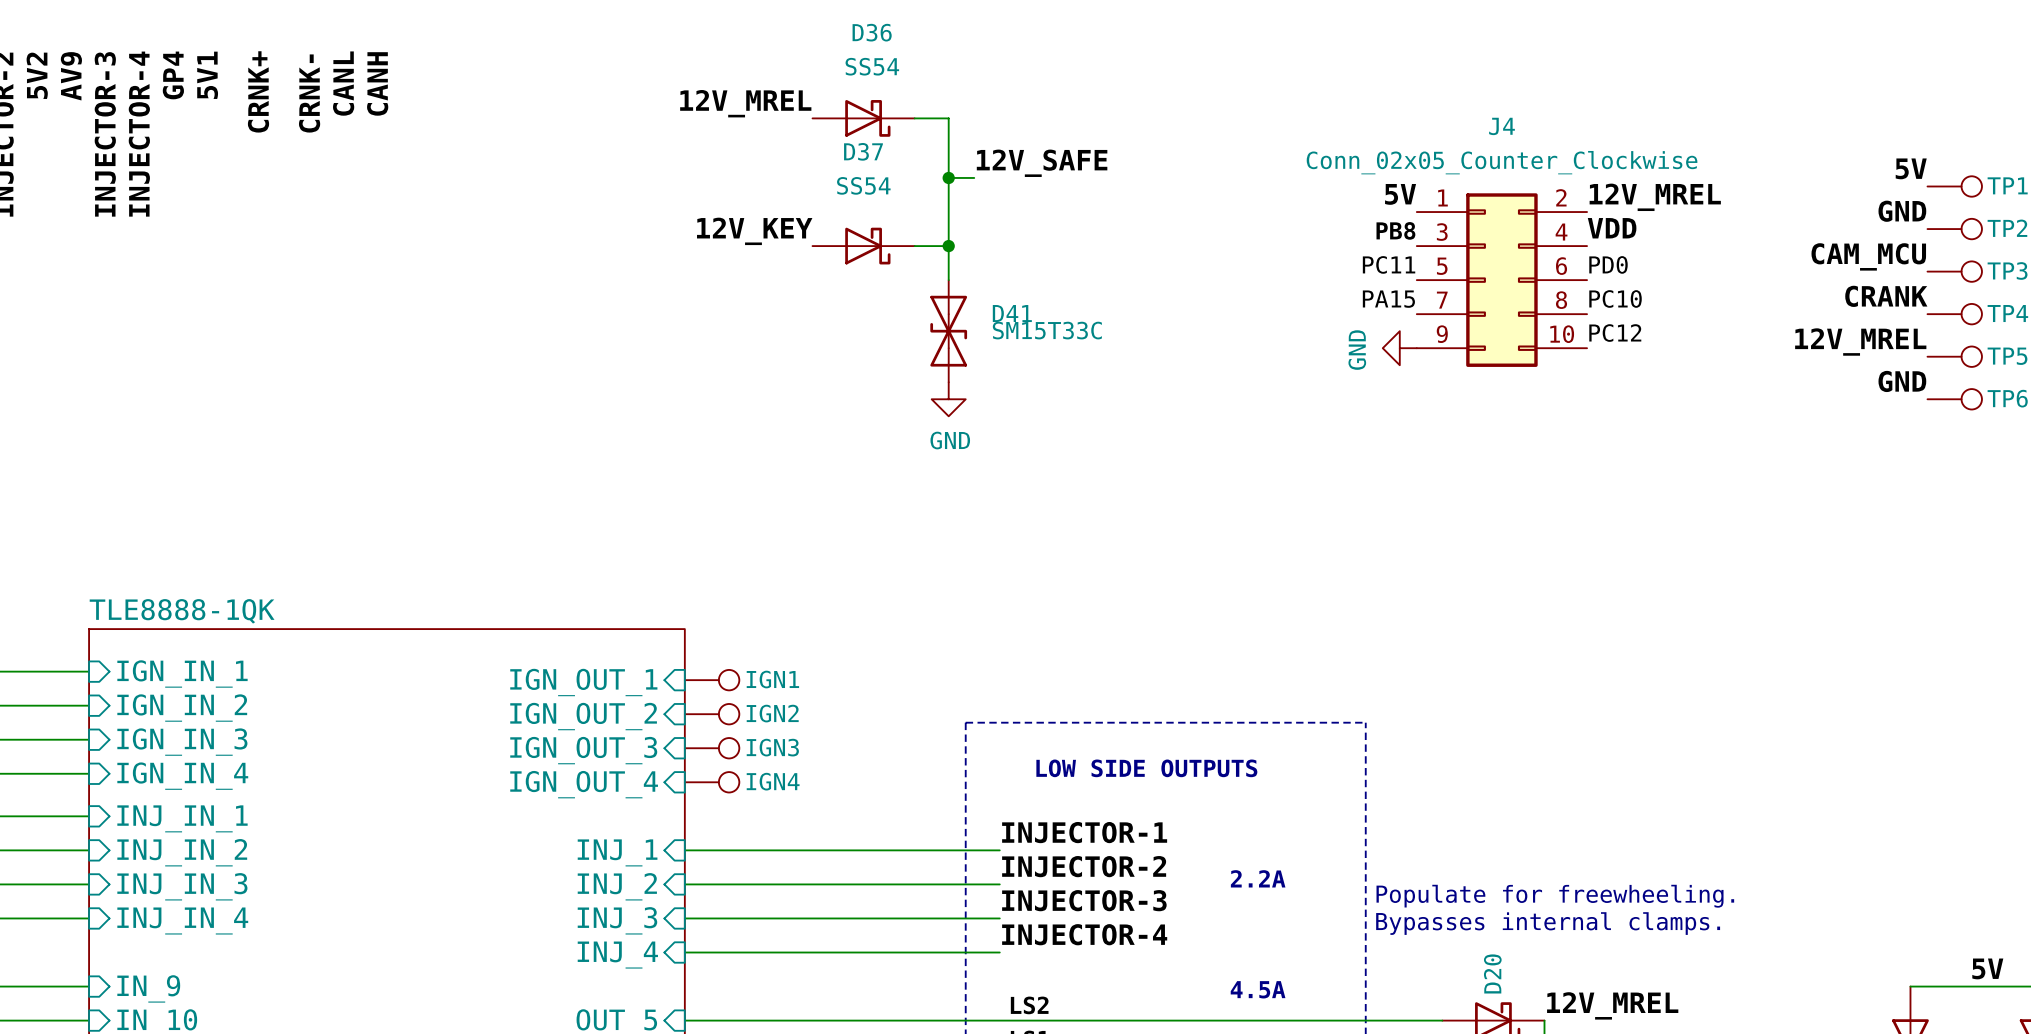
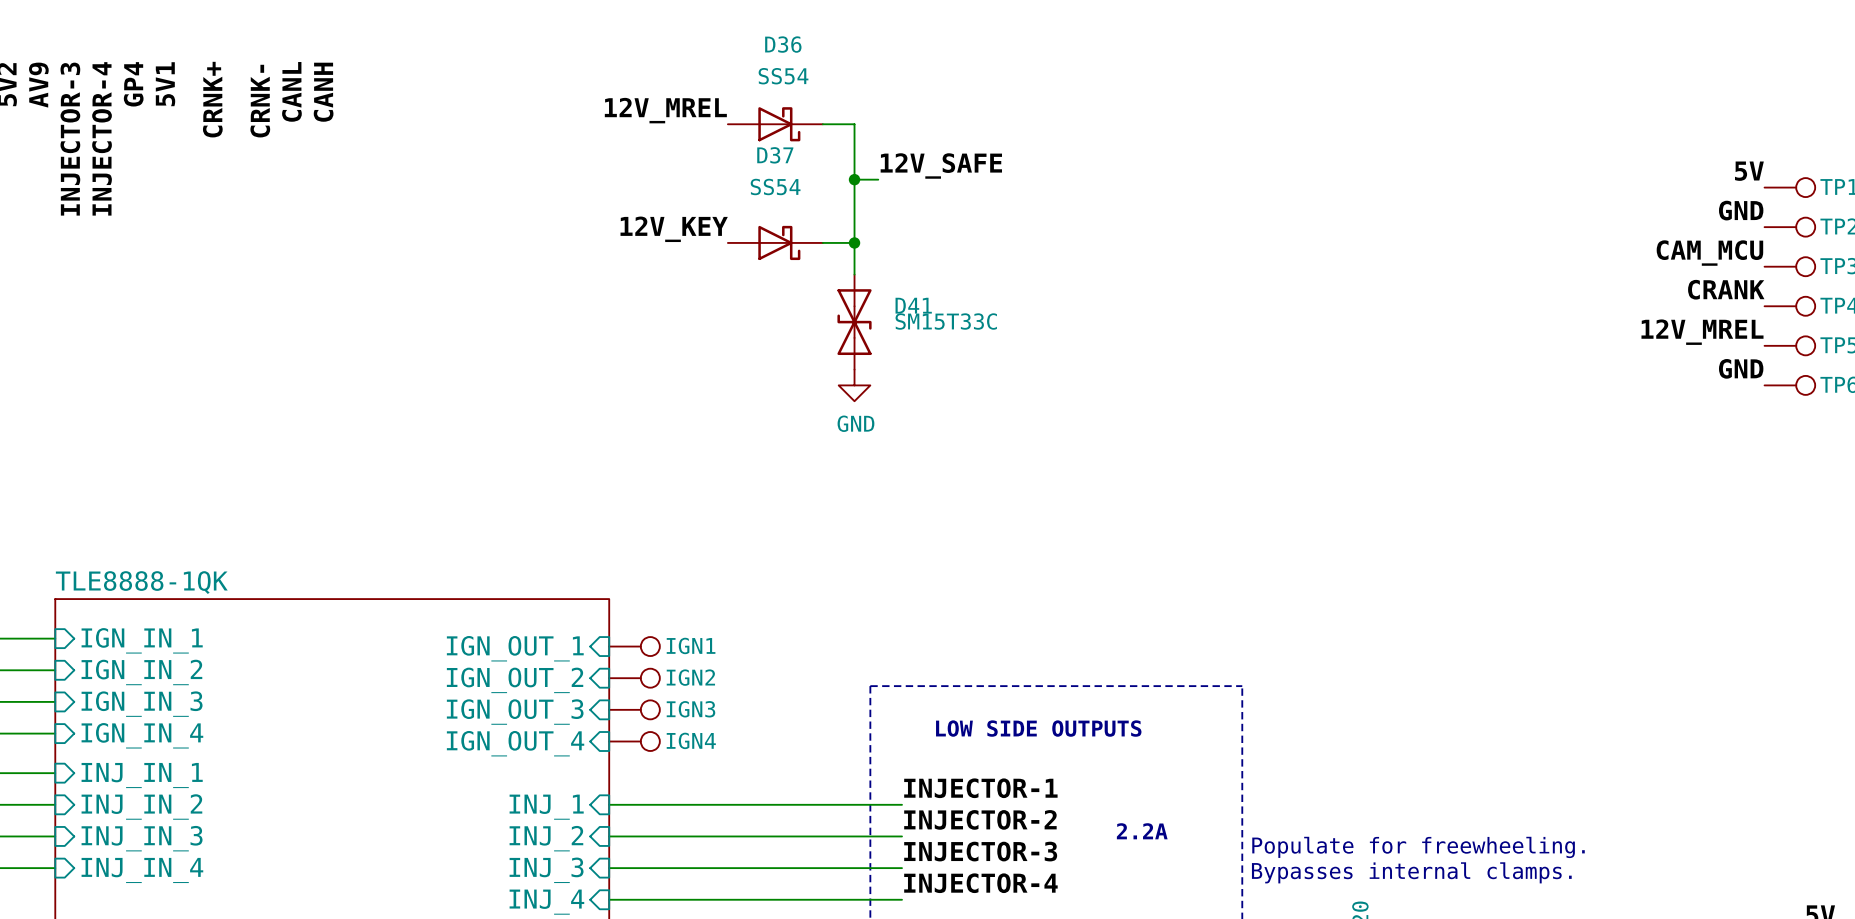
label: 5V (1400, 194) -> none
label: 12V_MREL (1655, 197) -> none
label: VDD (1612, 228) -> none
label: PB8 (1395, 230) -> none
label: PC11 (1389, 264) -> none
label: PD0 (1608, 264) -> none
J4: Conn_02x05_Counter_Clockwise (1501, 280) -> none
label: PC10 (1615, 298) -> none
label: PA15 (1388, 299) -> none
label: PC12 (1615, 333) -> none
power symbol: GND (1399, 348) -> none

